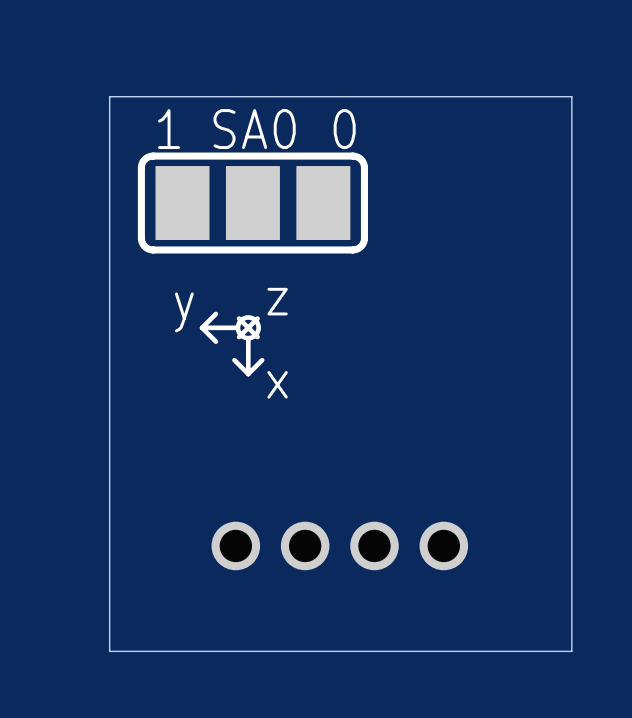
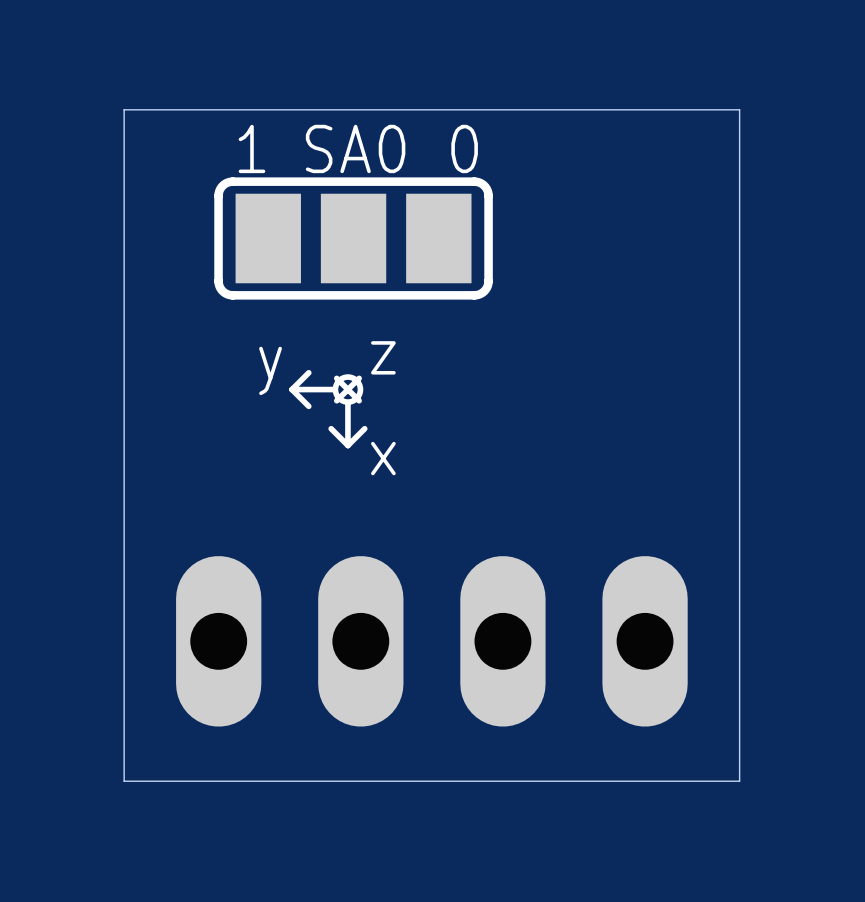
board edge: (109, 96) (109, 651) -> (180, 109) (124, 109) (124, 781) (180, 781)
part footprint: [211, 521, 469, 571] -> [176, 556, 688, 727]

